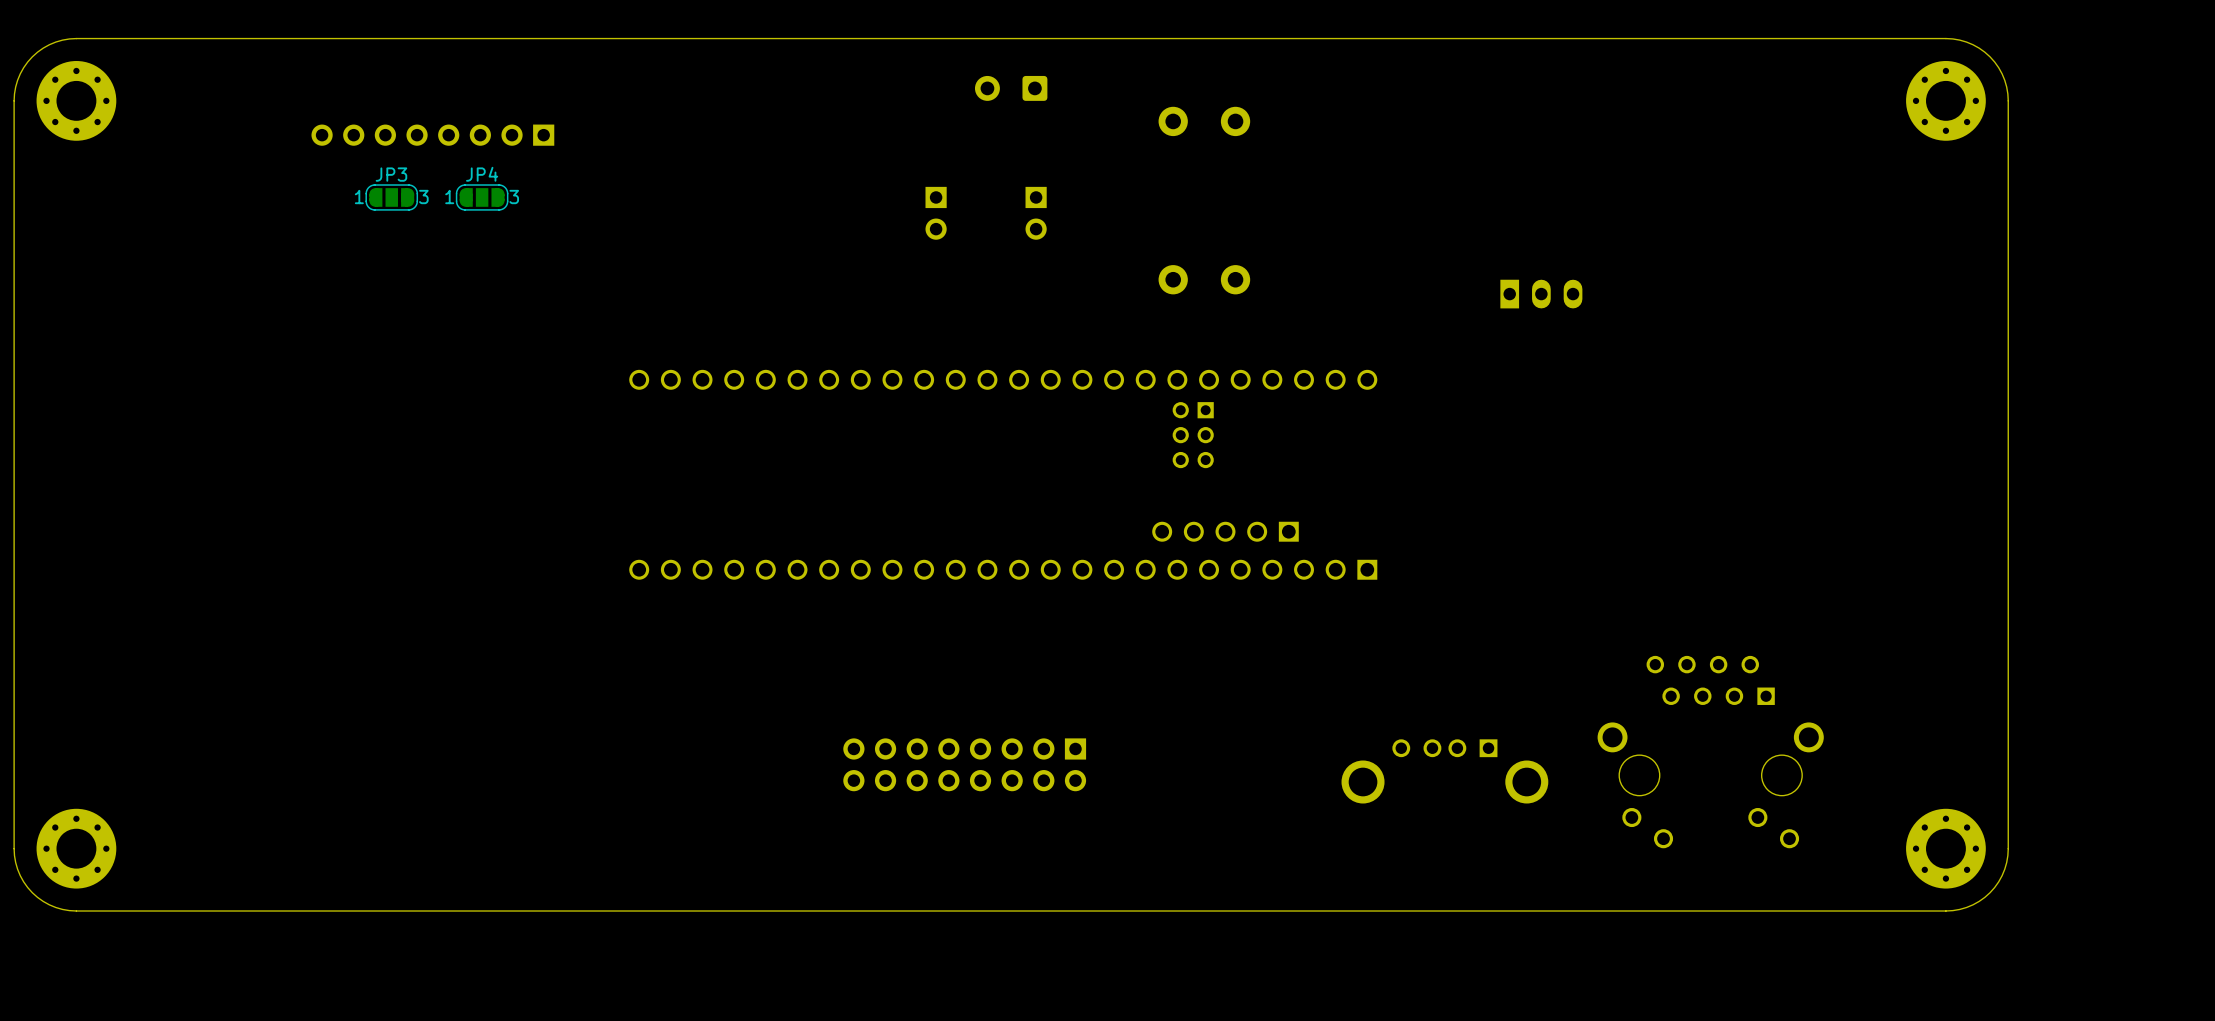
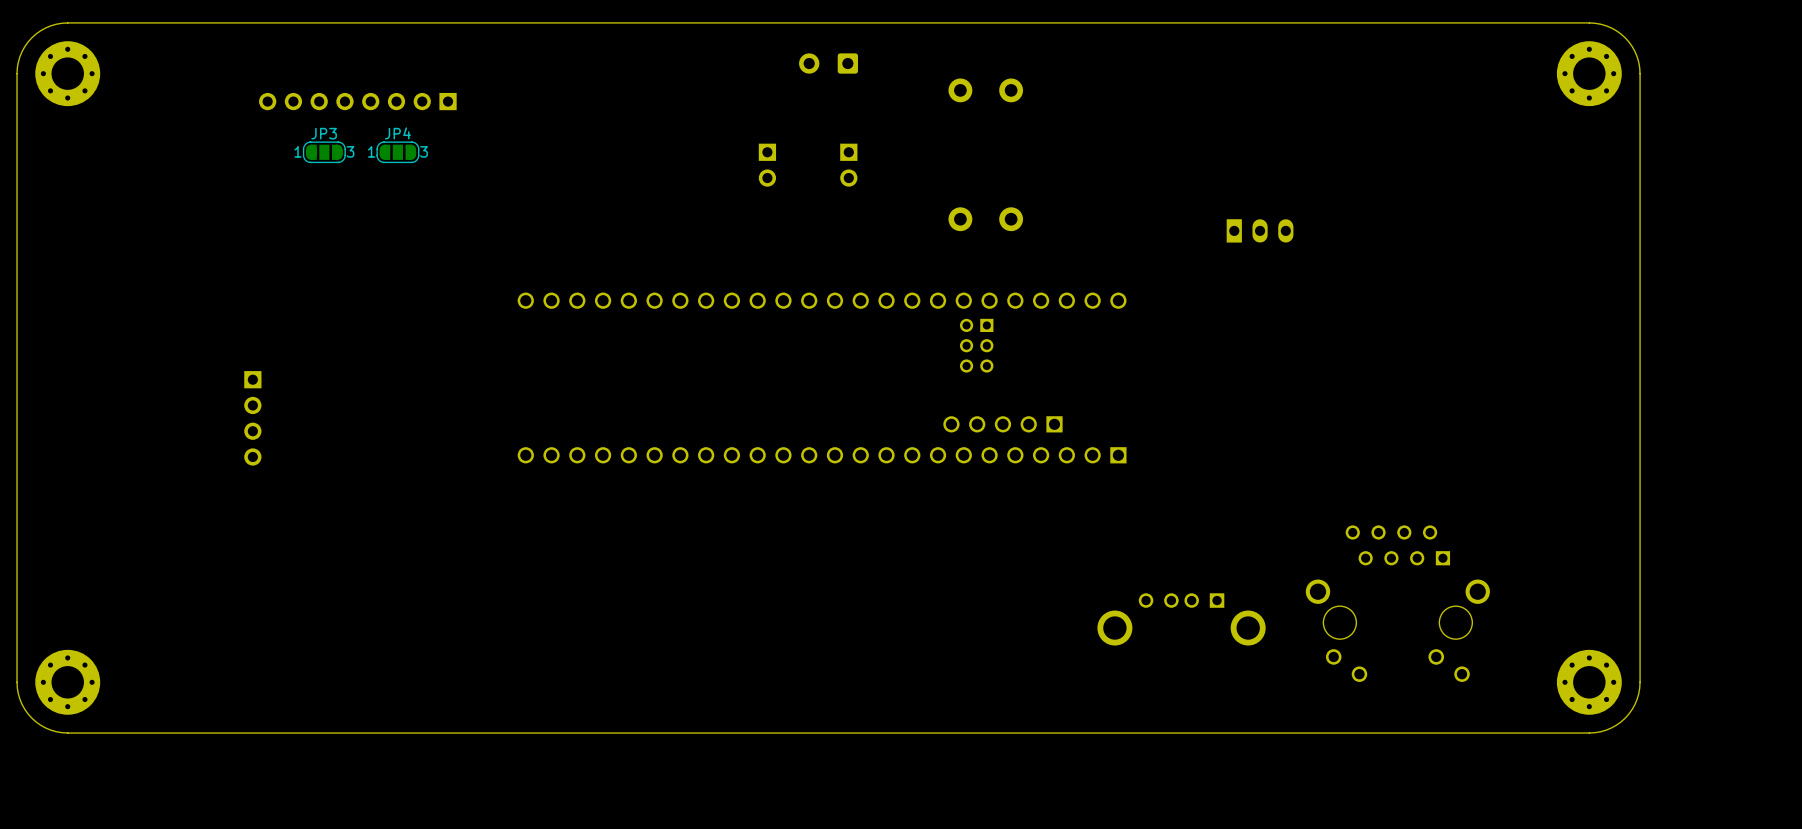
part: none -> (252, 418)
part: (964, 764) -> none

